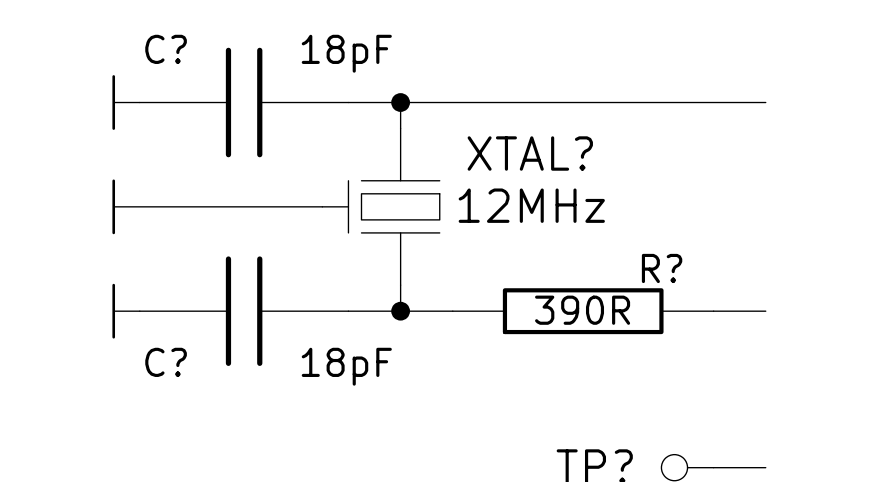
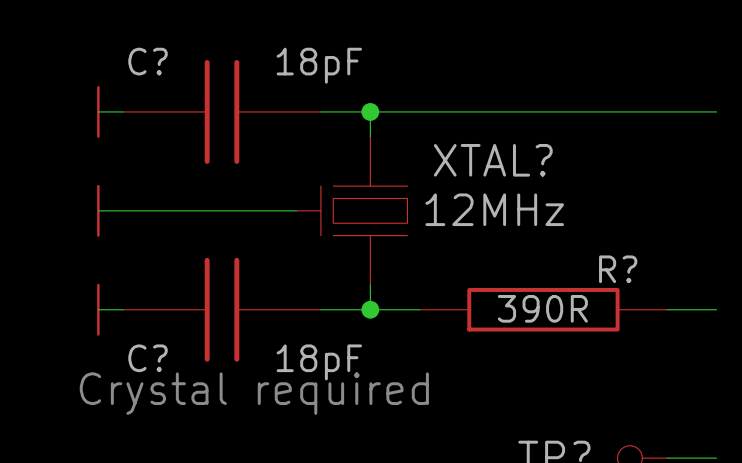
text: none -> Crystal required (254, 393)

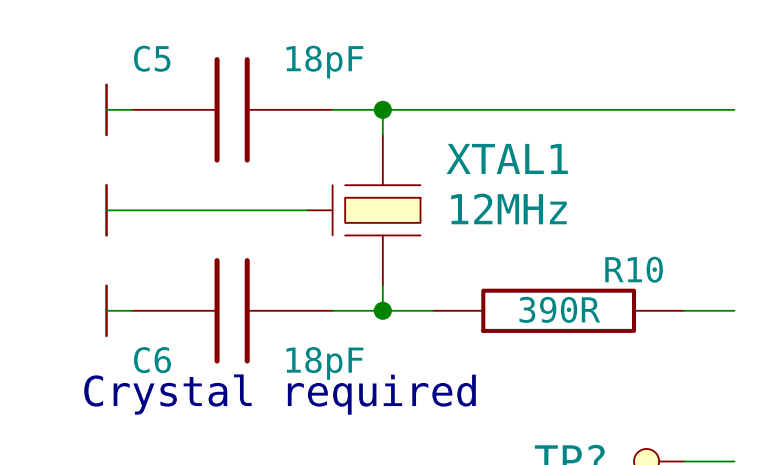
C? name: C? (148, 61) -> C5 (152, 58)
XTAL? name: XTAL? (493, 160) -> XTAL1 (507, 158)
R? name: R? (618, 269) -> R10 (634, 269)
C? name: C? (148, 358) -> C6 (152, 360)

